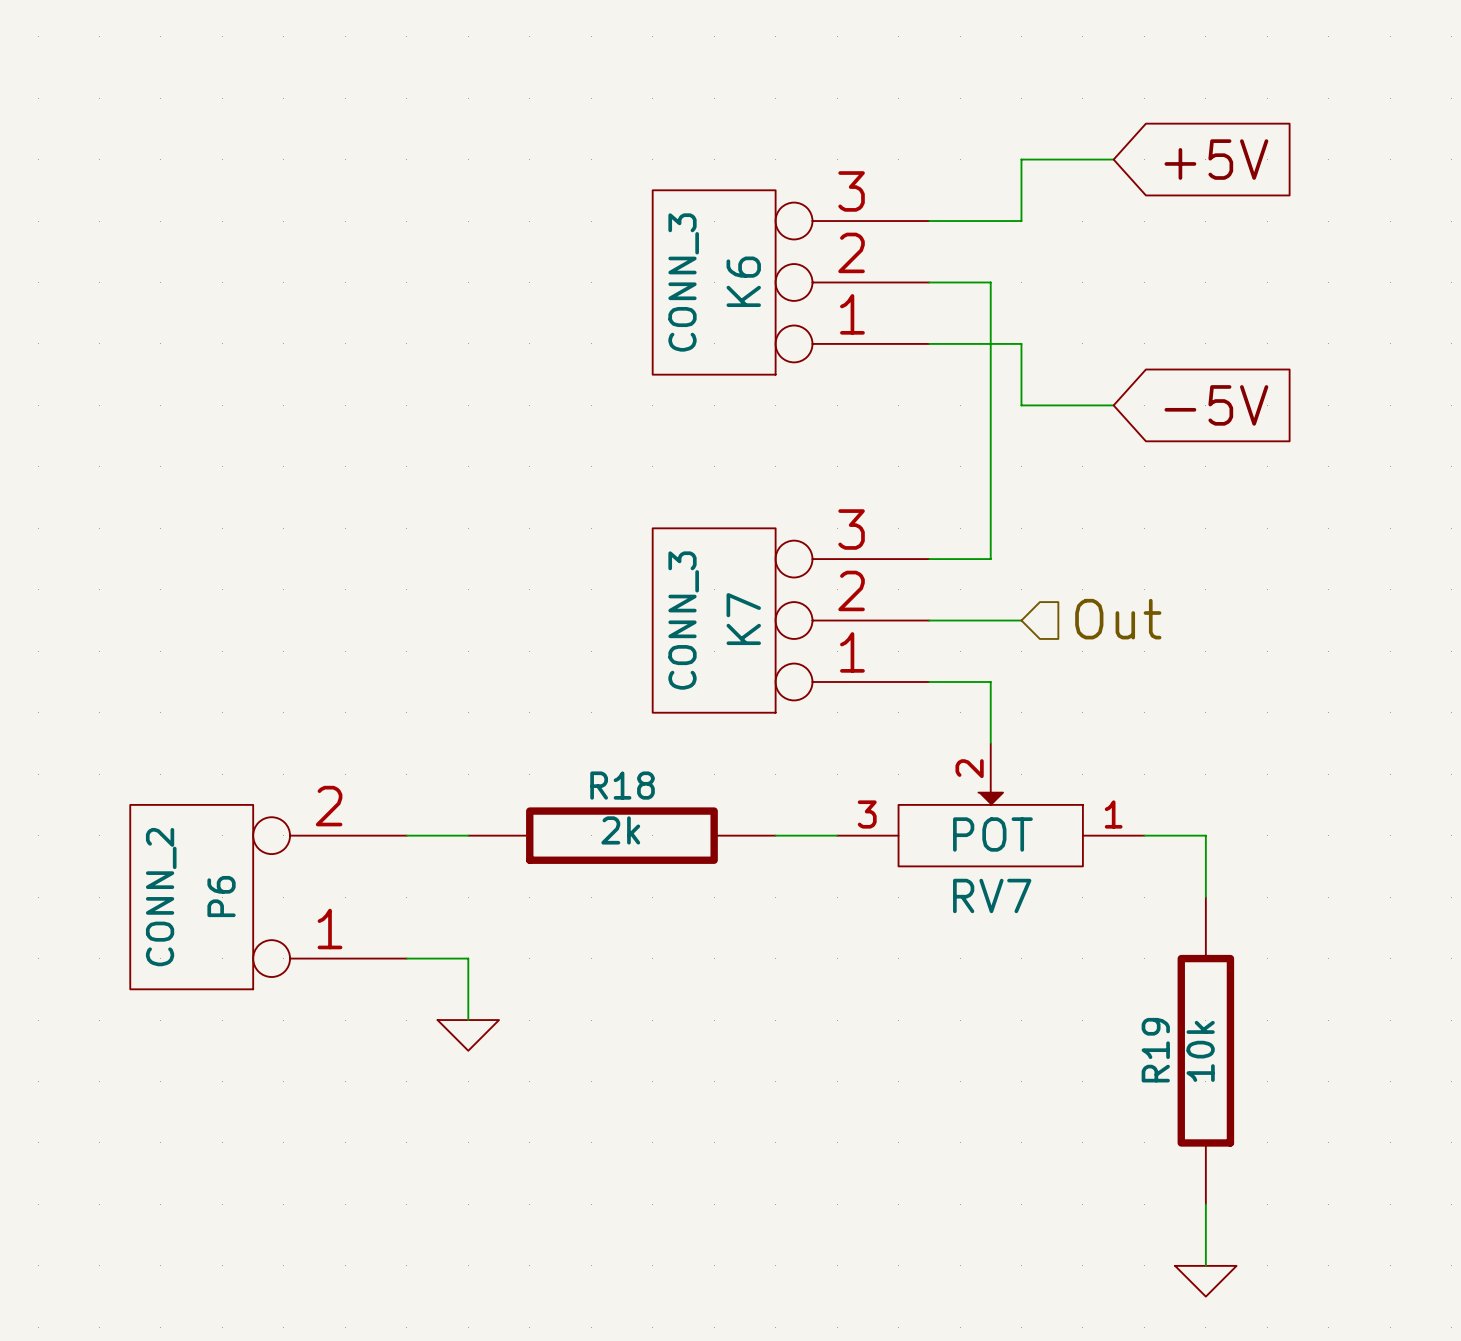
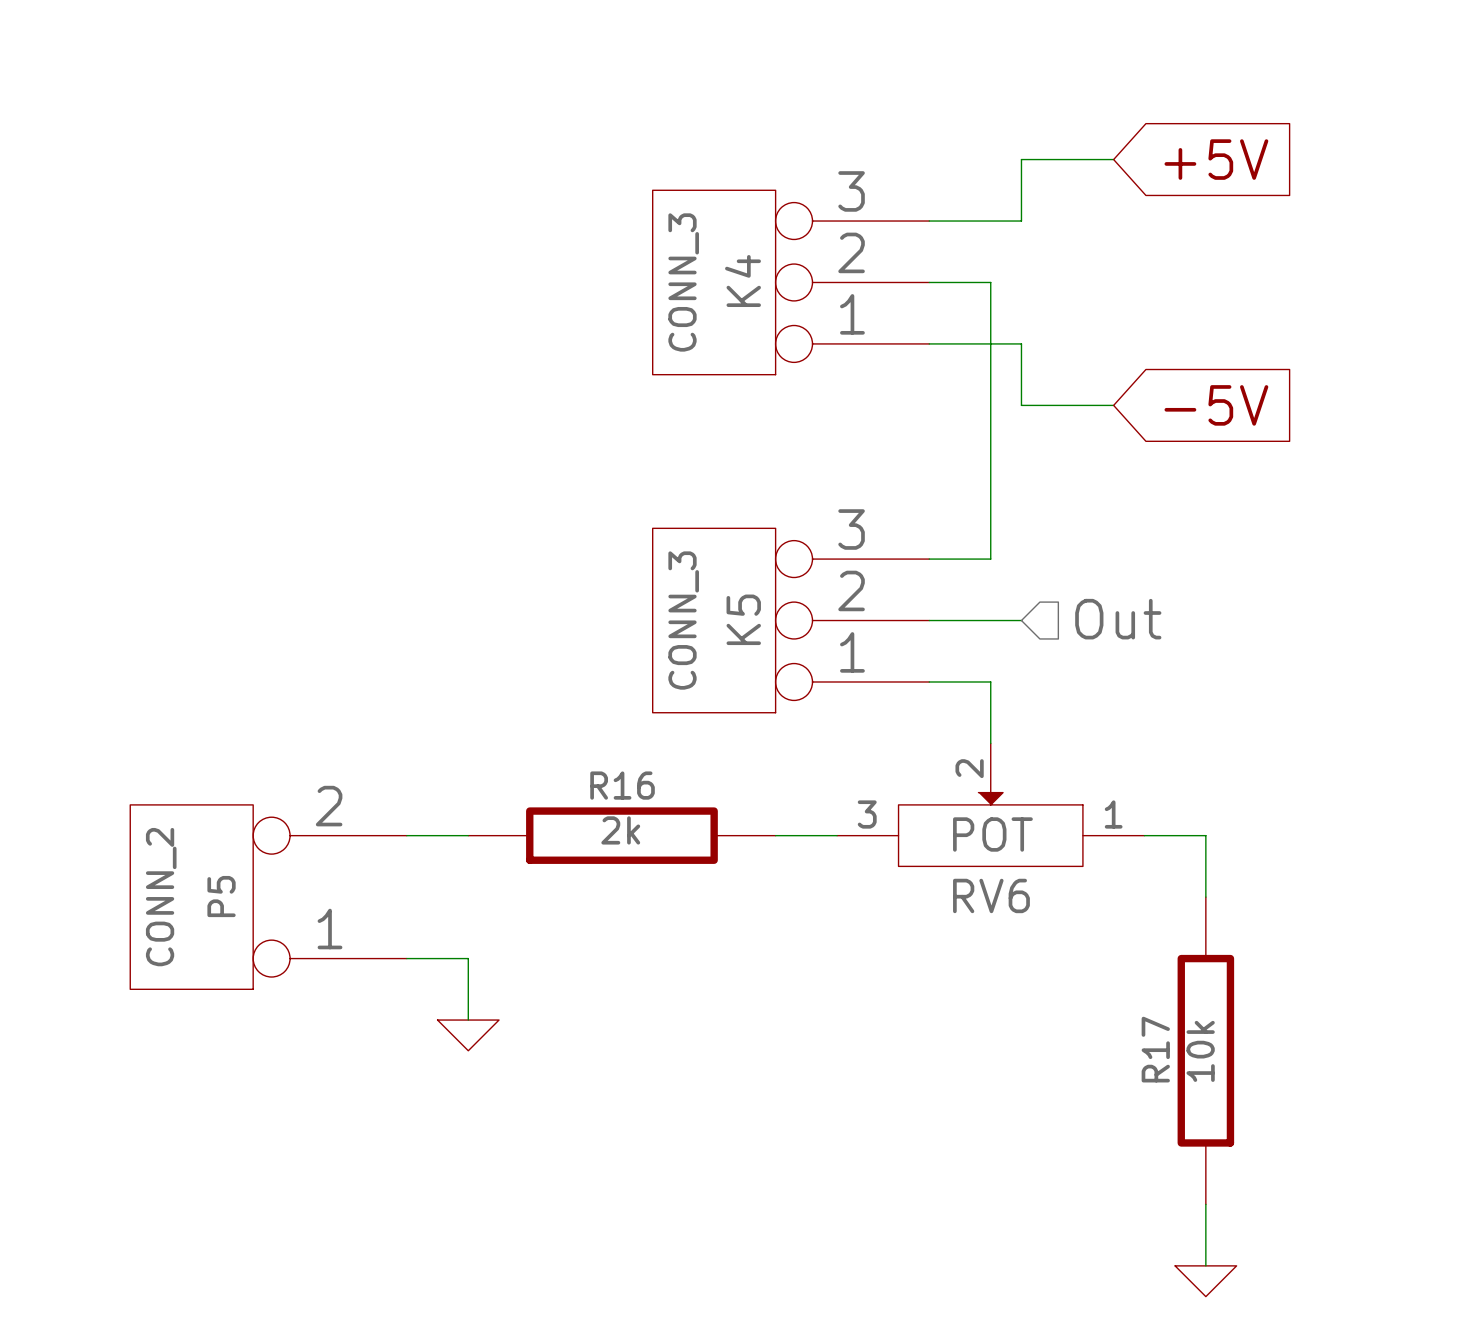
K6 name: K6 (743, 281) -> K4 (743, 281)
K7 name: K7 (743, 619) -> K5 (743, 619)
R18 name: R18 (622, 785) -> R16 (622, 785)
RV7 name: RV7 (992, 895) -> RV6 (991, 895)
P6 name: P6 (221, 896) -> P5 (221, 896)
R19 name: R19 (1155, 1050) -> R17 (1155, 1049)

